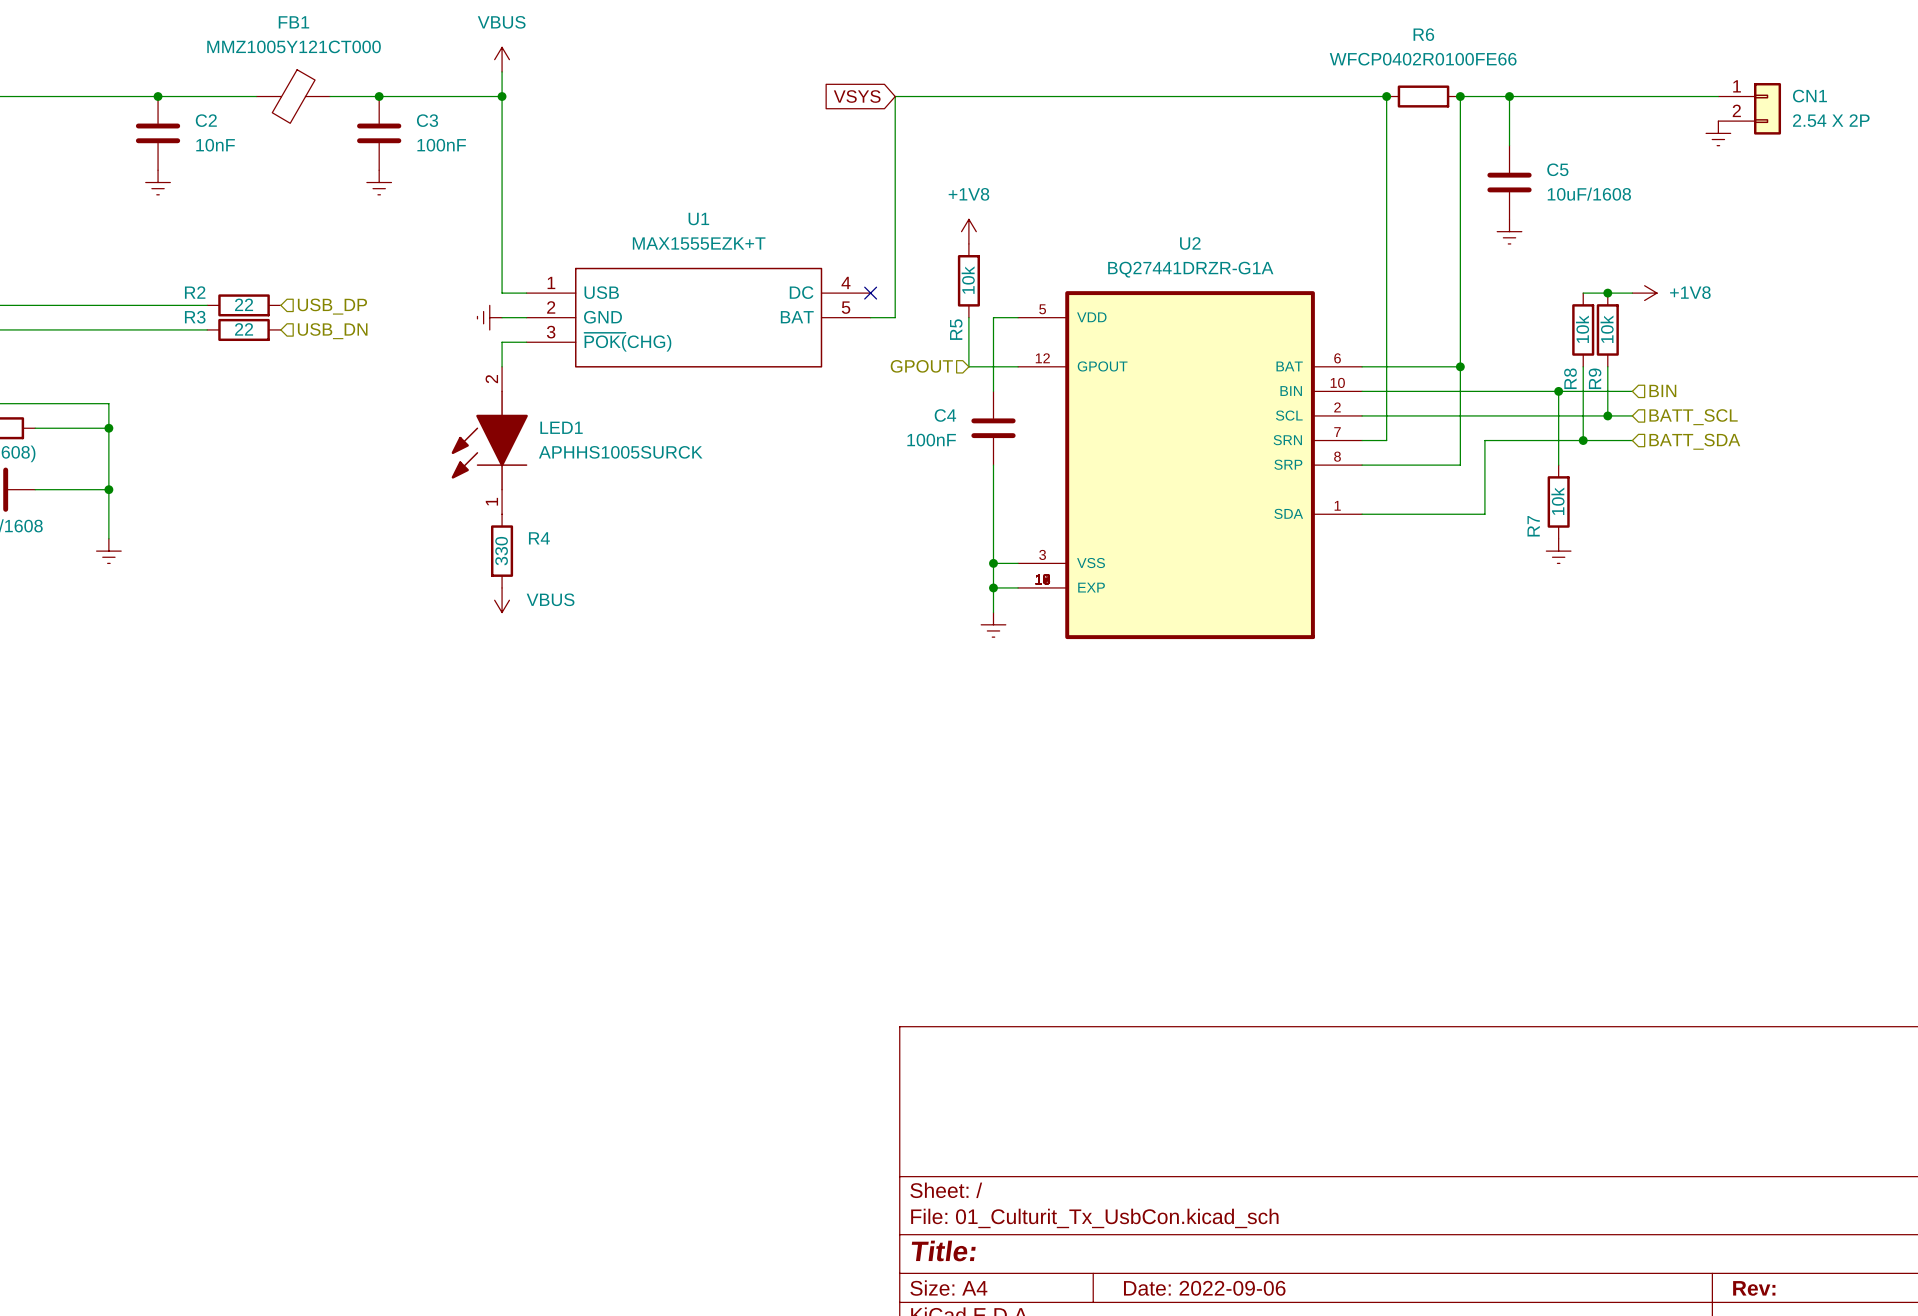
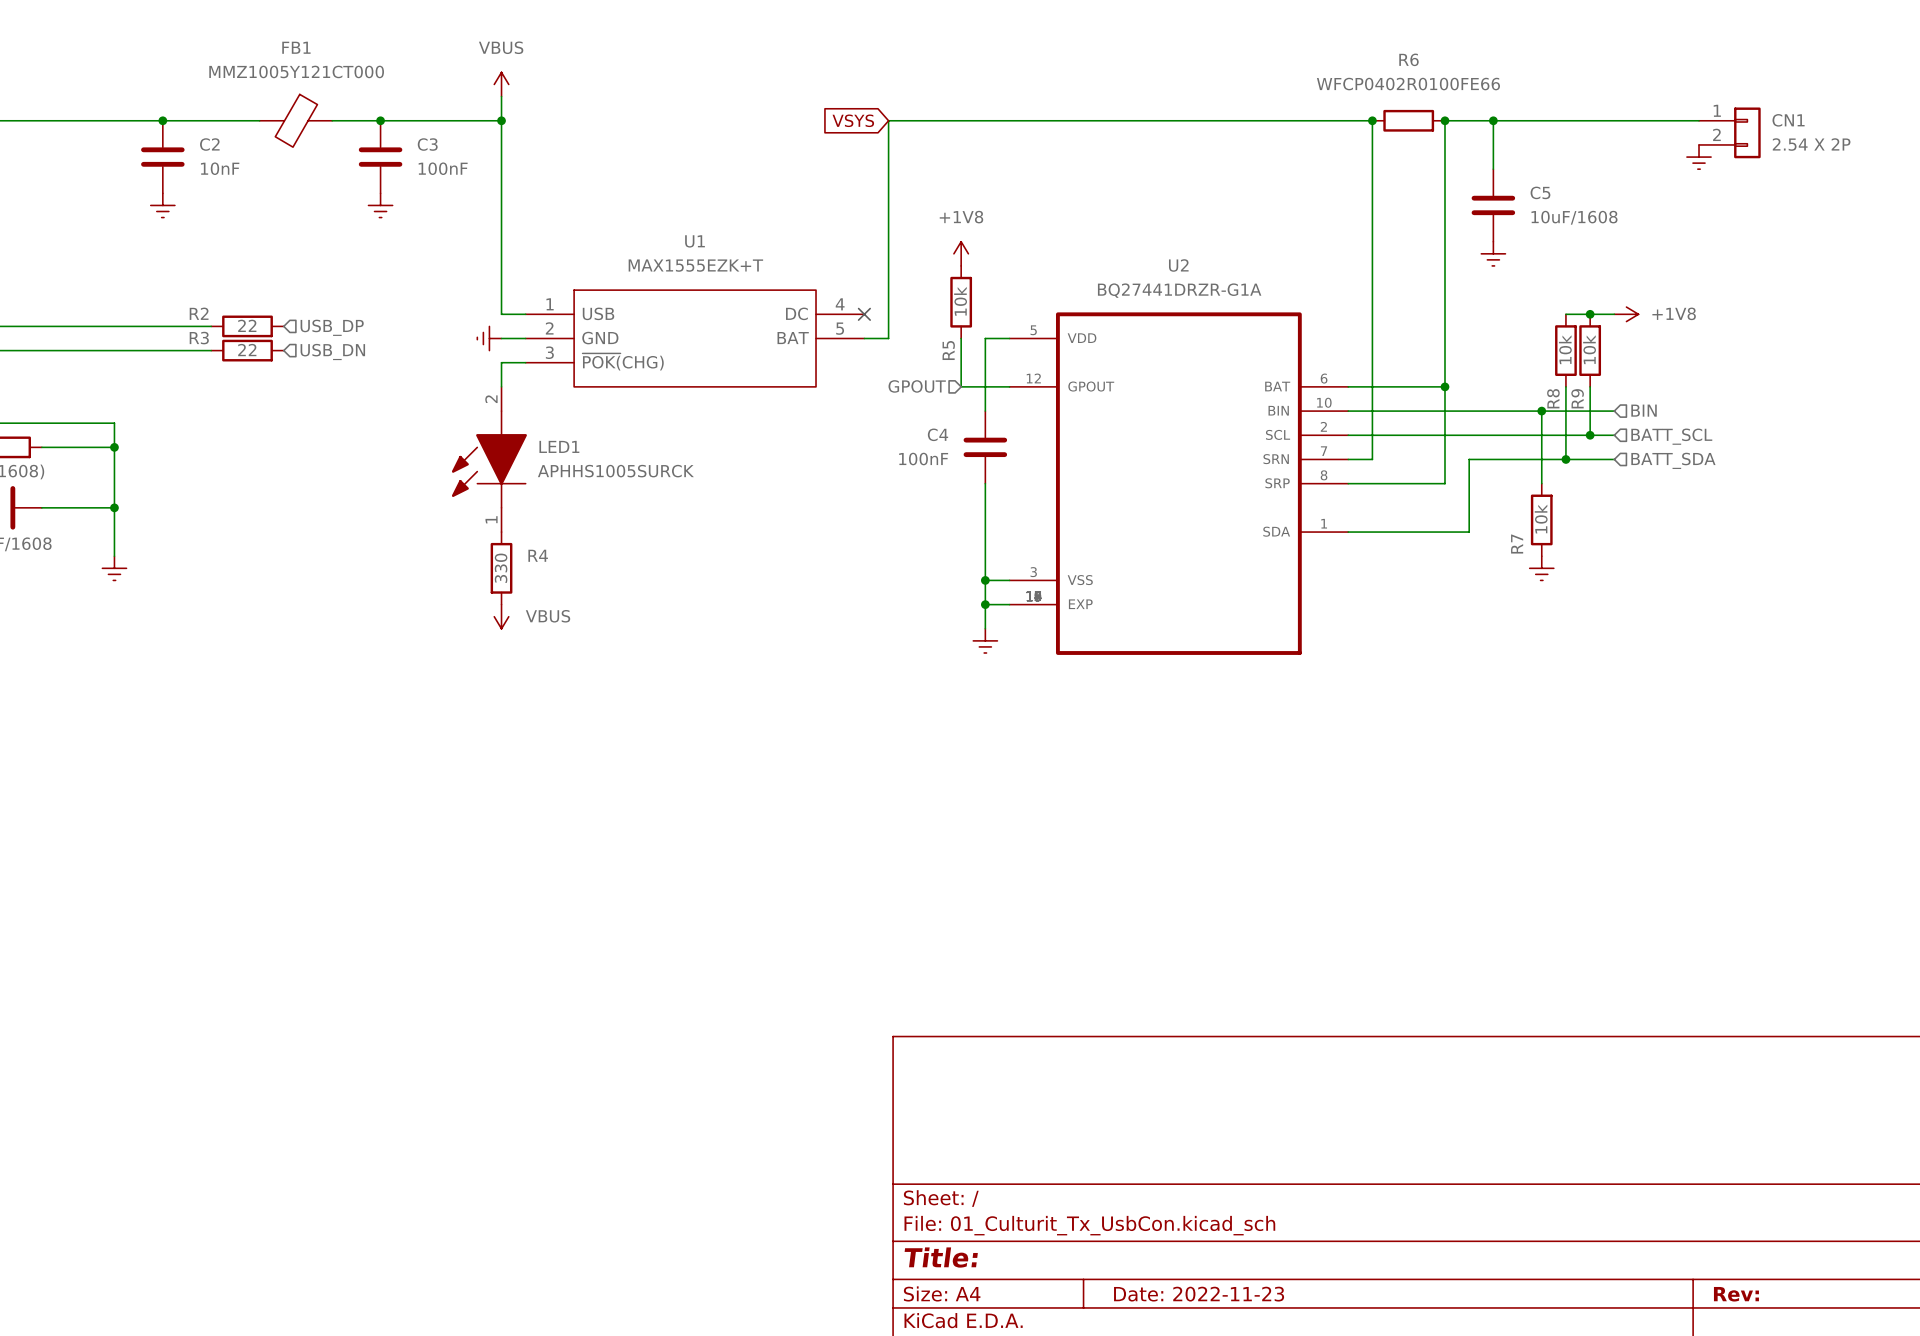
title block: Date: 2022-09-06 (1204, 1288) -> Date: 2022-11-23 (1199, 1294)

